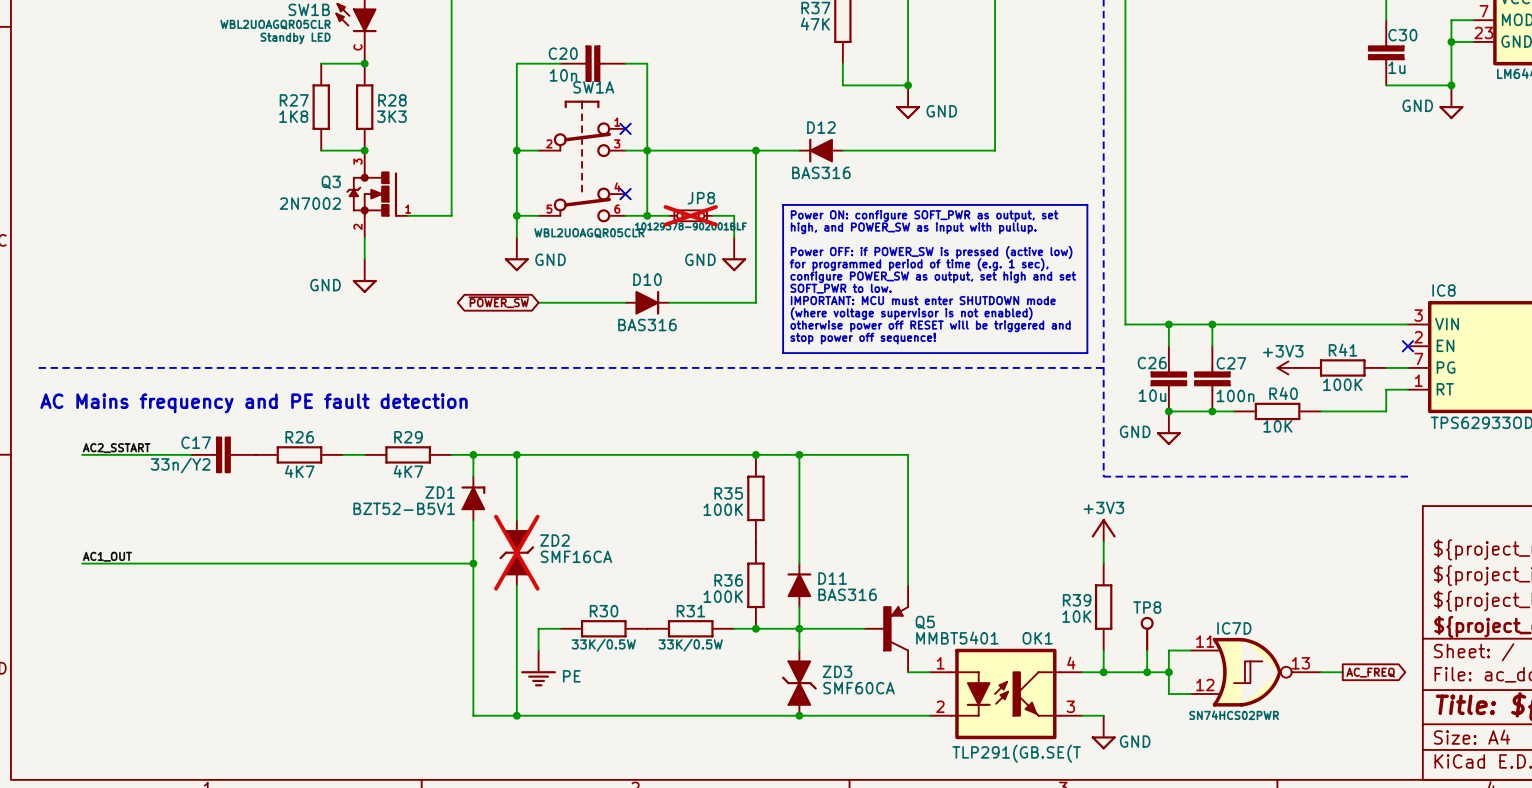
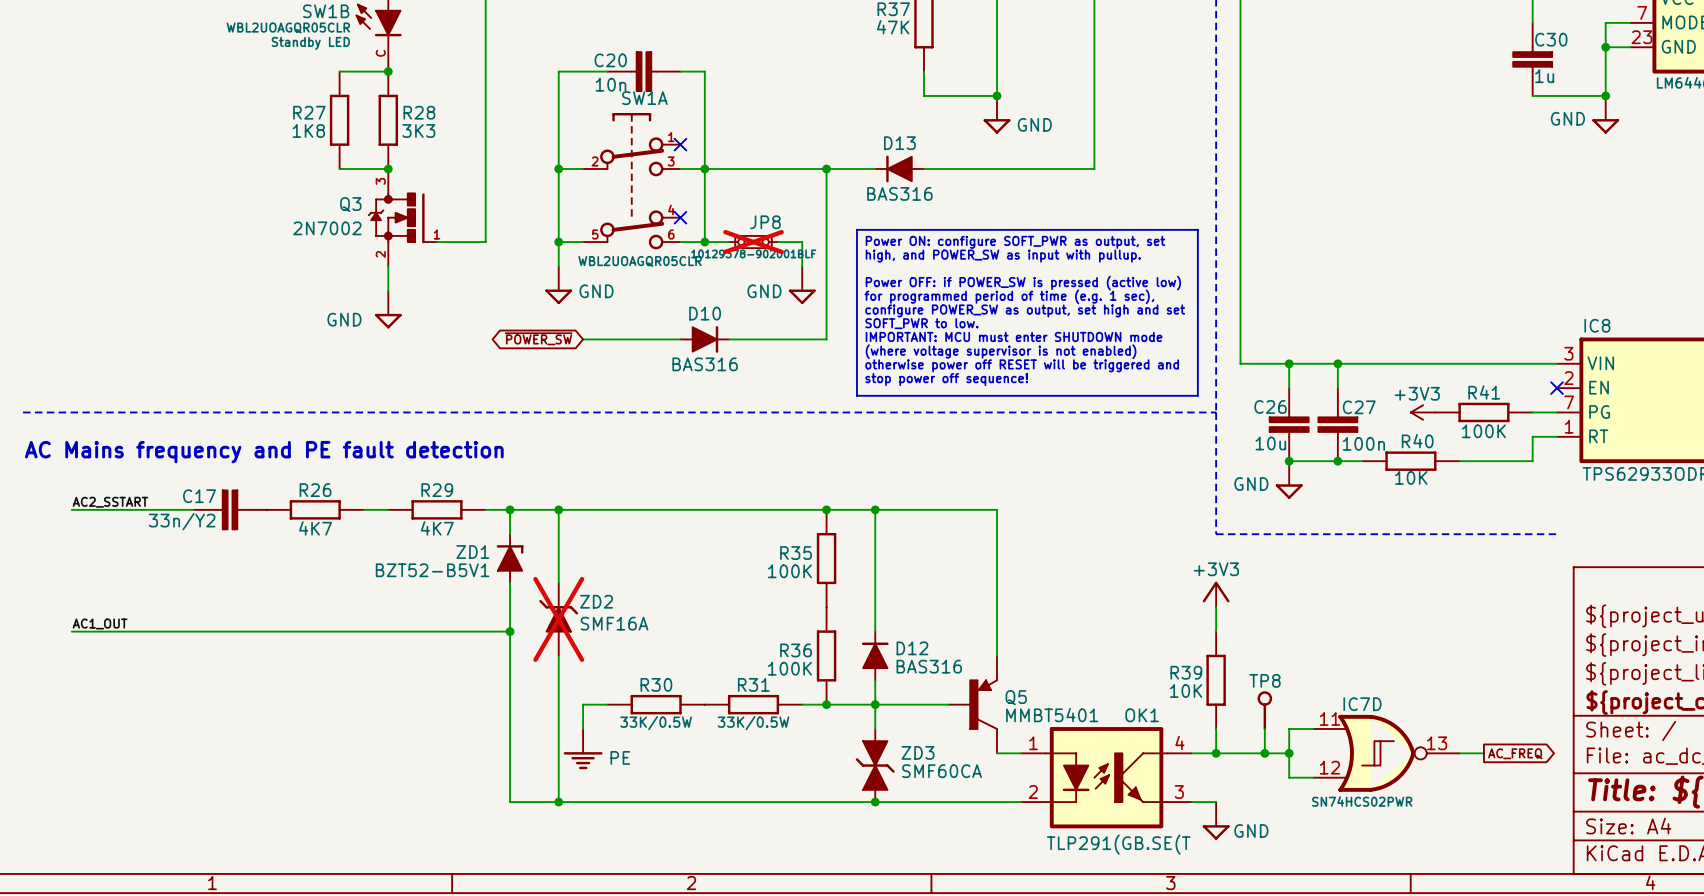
D12 name: D12 (821, 127) -> D13 (899, 143)
ZD2 symbol: [499, 520, 535, 586] -> [539, 582, 579, 656]
ZD2 value: SMF16CA (576, 556) -> SMF16A (614, 623)
D11 name: D11 (832, 578) -> D12 (912, 648)

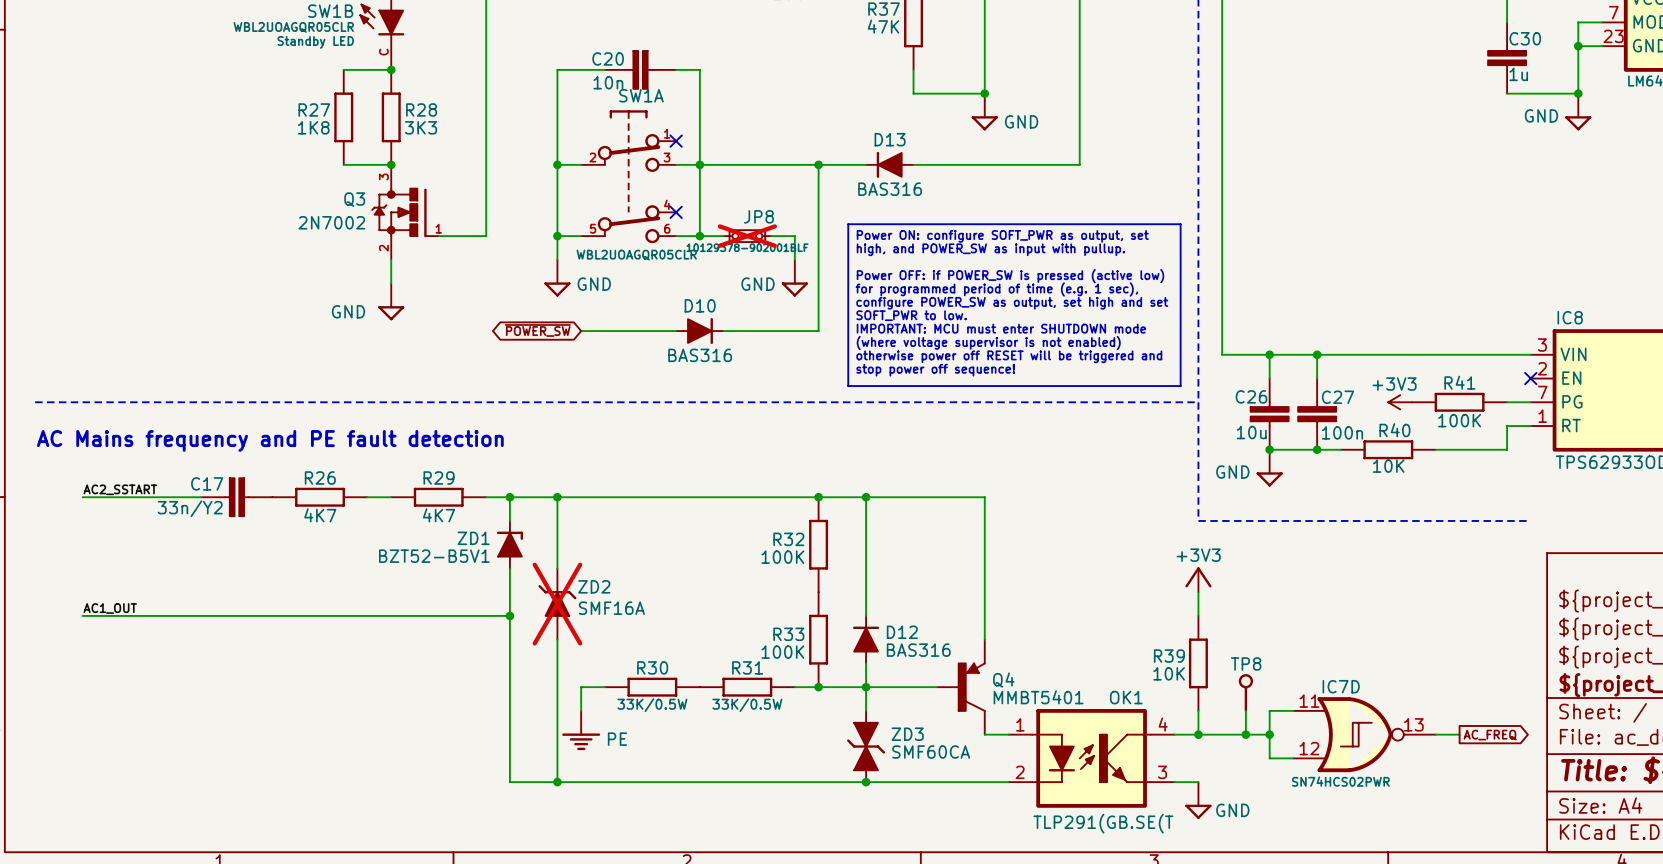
R35 name: R35 (796, 553) -> R32 (788, 539)
R36 name: R36 (796, 650) -> R33 (788, 634)
Q5 name: Q5 (1016, 697) -> Q4 (1003, 680)

